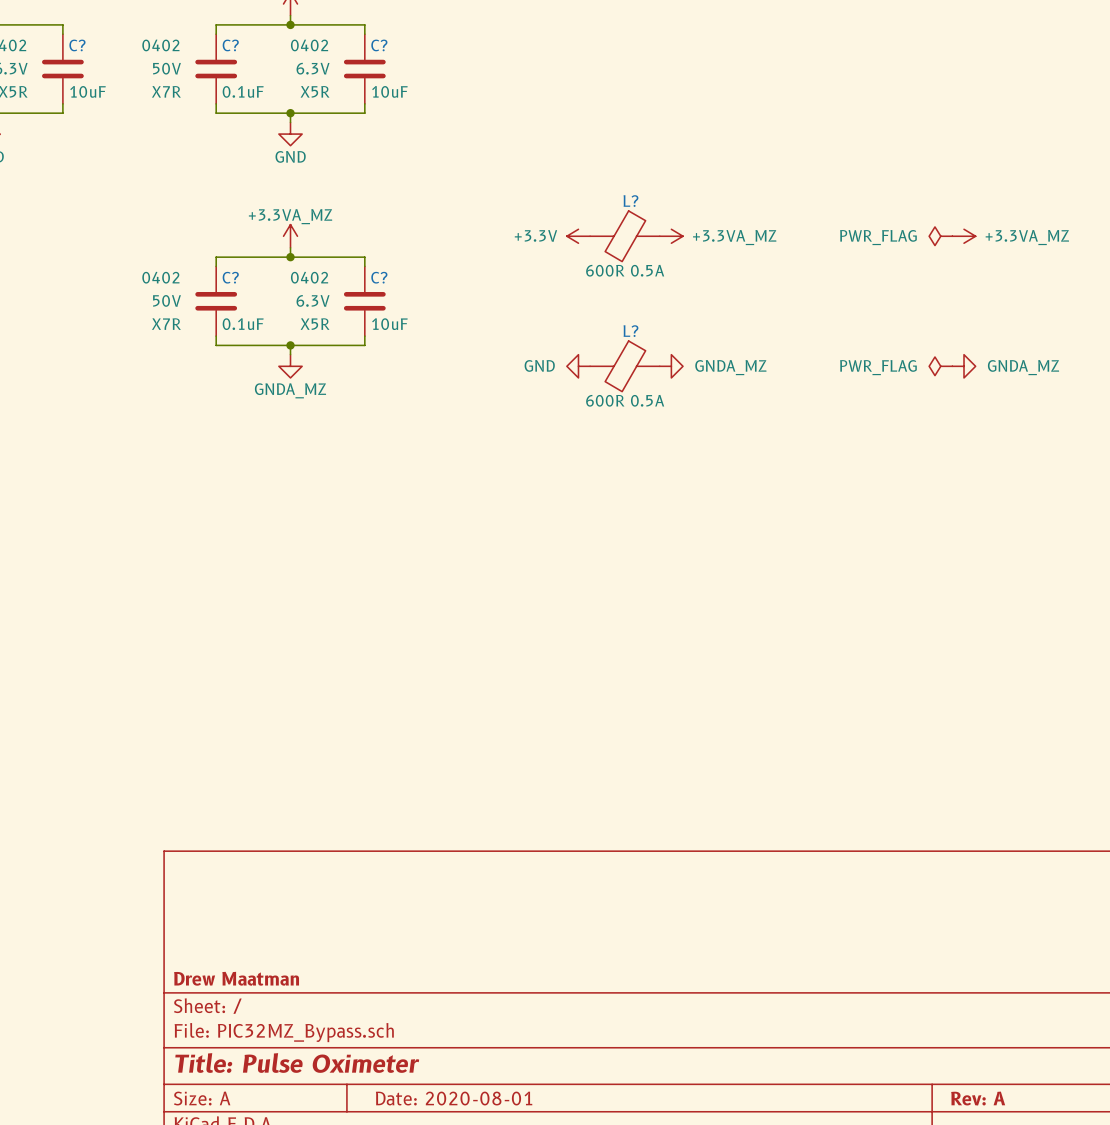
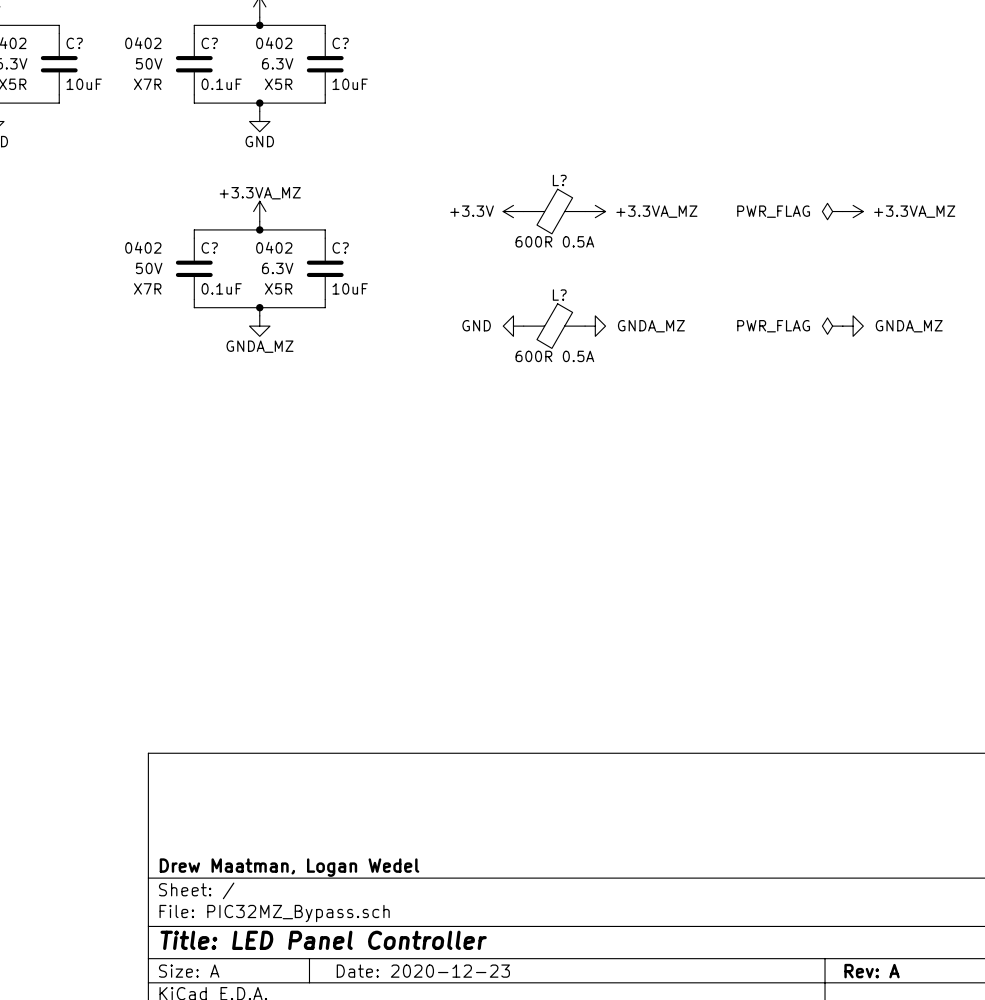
title block: Drew Maatman (236, 978) -> Drew Maatman, Logan Wedel (289, 867)
title block: Title: Pulse Oximeter (297, 1063) -> Title: LED Panel Controller (323, 940)
title block: Date: 2020-08-01 (454, 1098) -> Date: 2020-12-23 (423, 971)

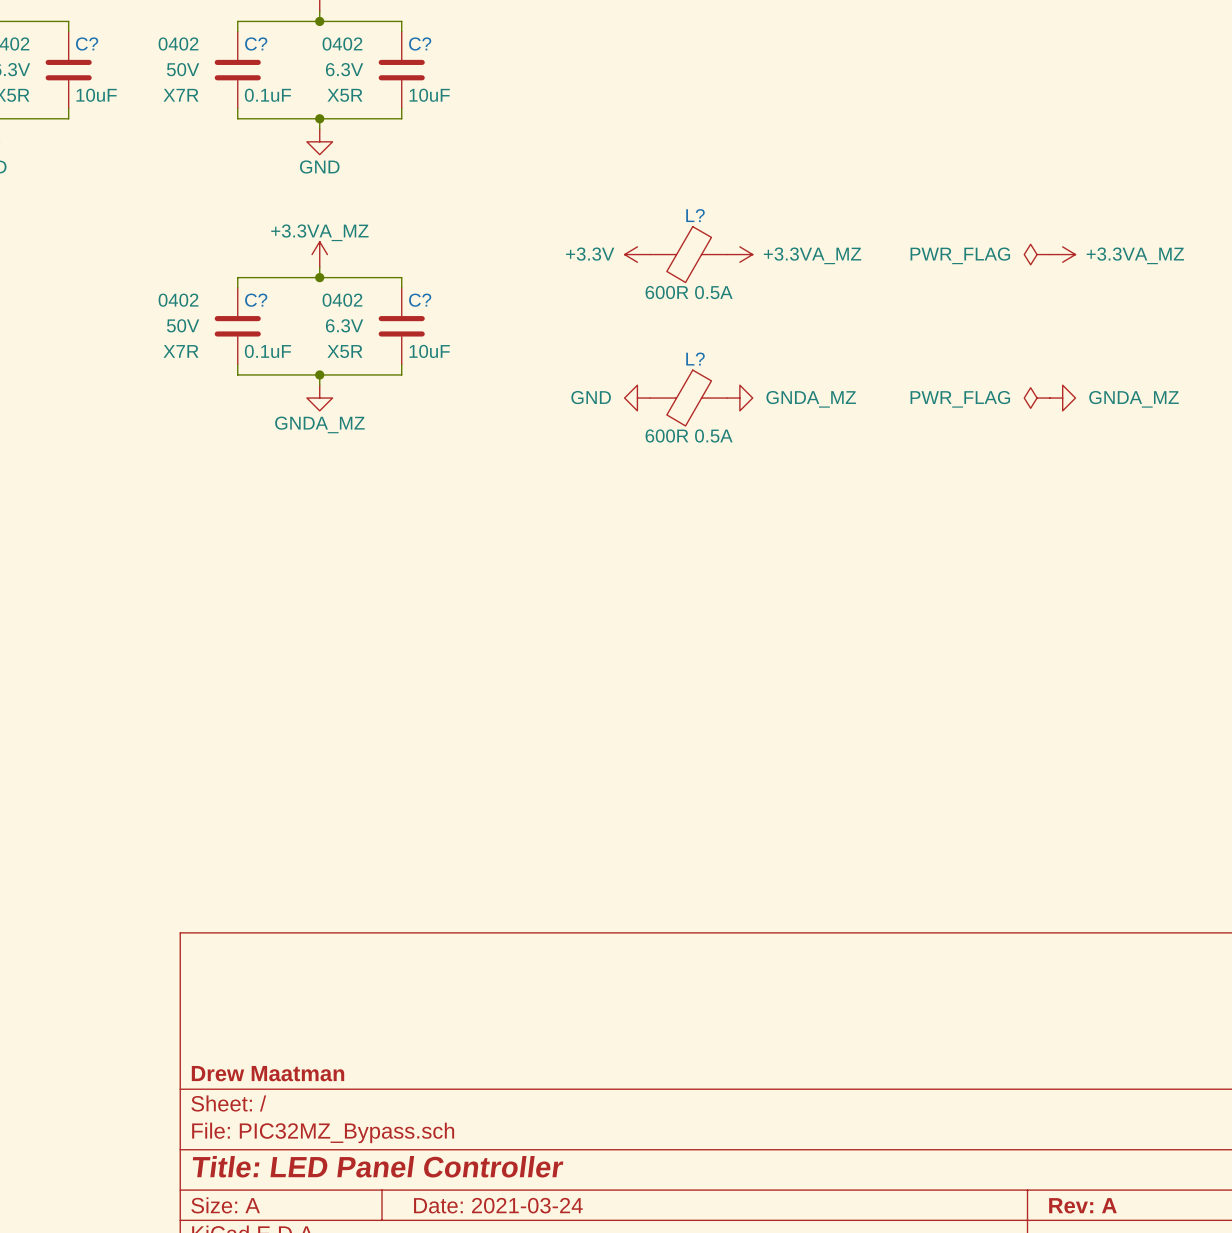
title block: Drew Maatman, Logan Wedel (289, 867) -> Drew Maatman (268, 1073)
title block: Date: 2020-12-23 (423, 971) -> Date: 2021-03-24 (498, 1205)

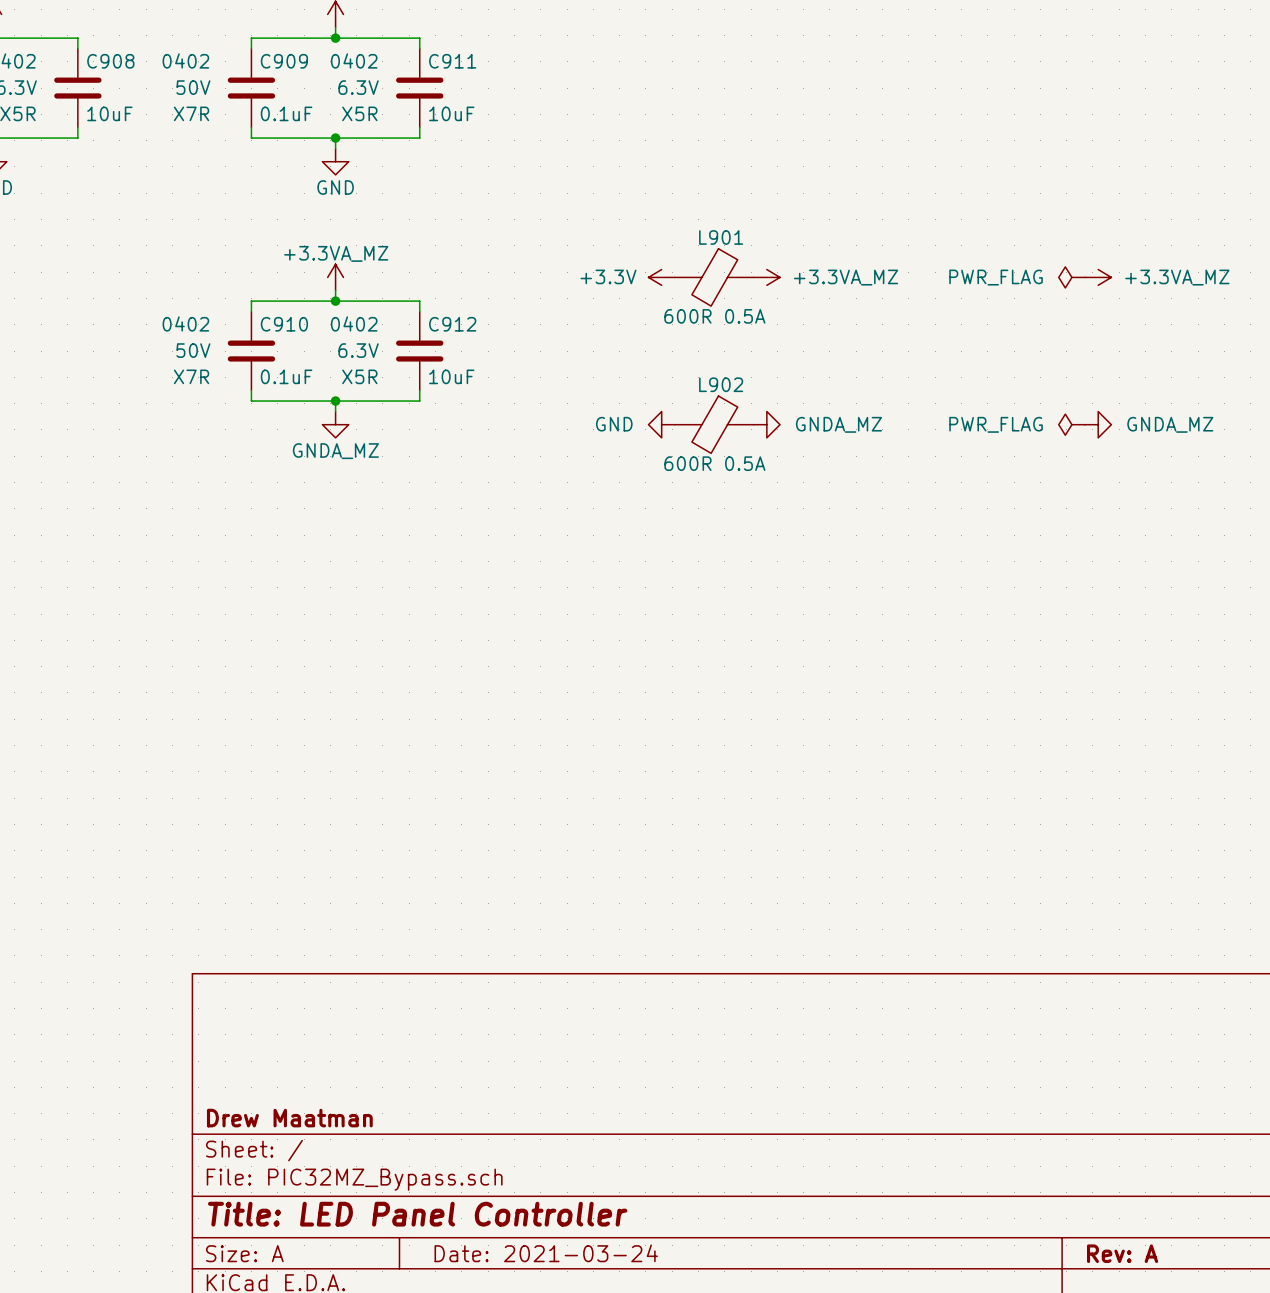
C? name: C? (87, 44) -> C908 (110, 61)
C? name: C? (256, 44) -> C909 (284, 61)
C? name: C? (420, 44) -> C911 (452, 61)
L? name: L? (695, 215) -> L901 (721, 237)
C? name: C? (256, 300) -> C910 (284, 324)
C? name: C? (420, 300) -> C912 (452, 324)
L? name: L? (695, 359) -> L902 (721, 384)

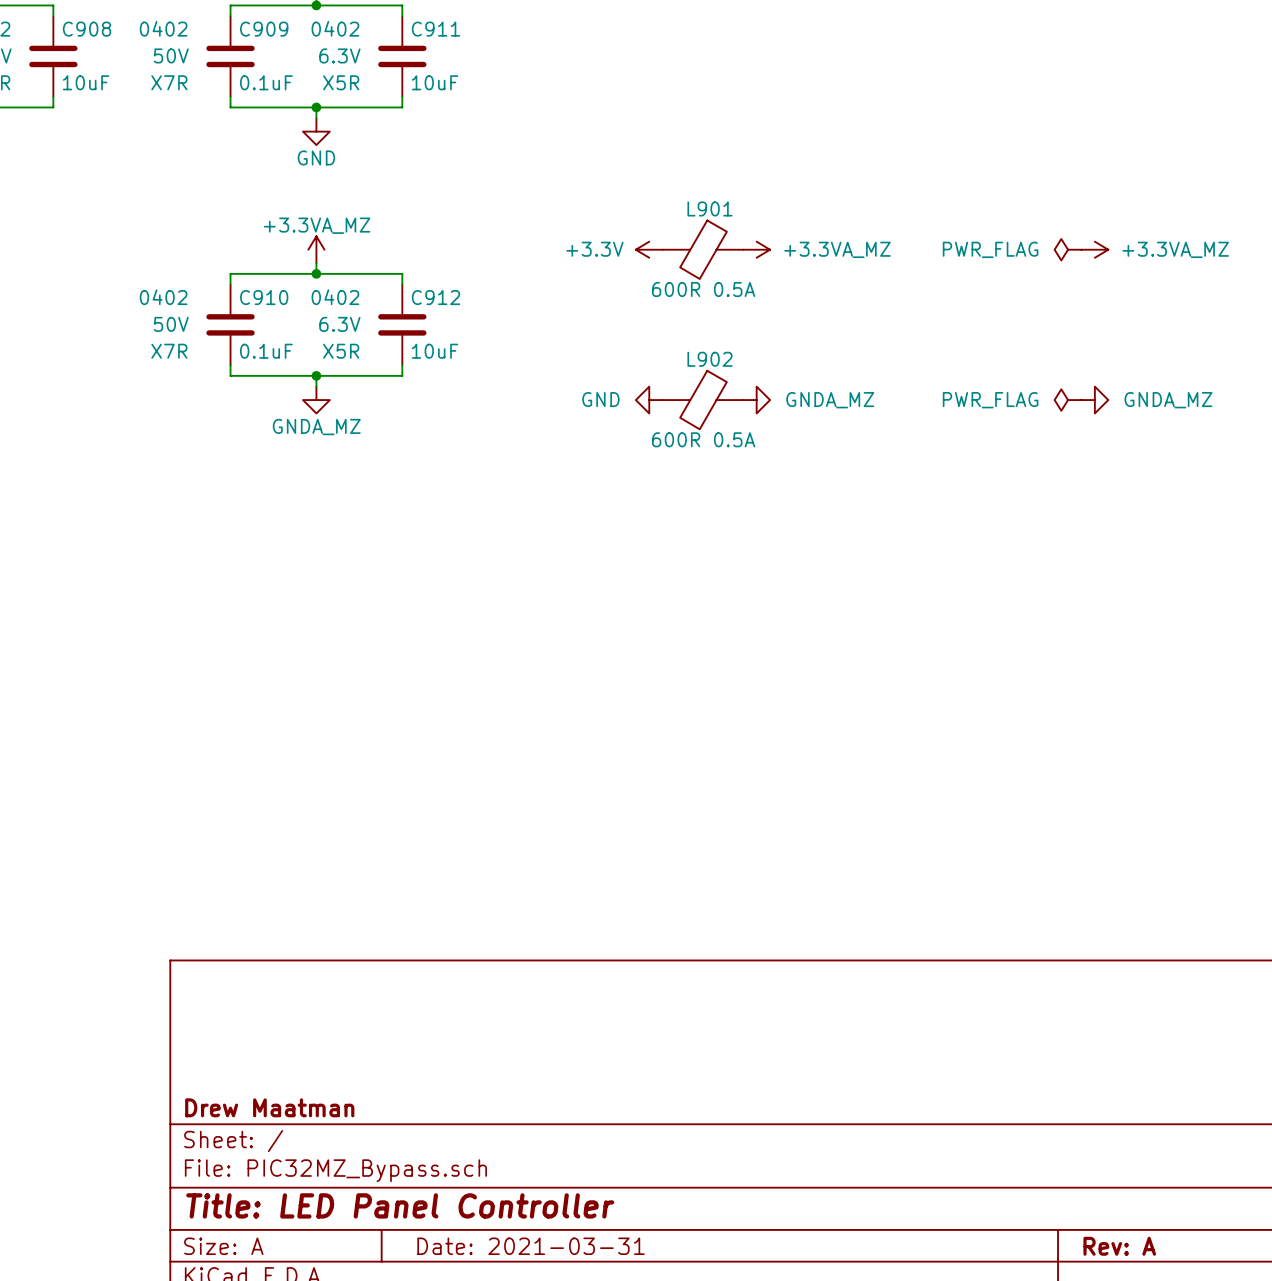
title block: Date: 2021-03-24 (546, 1253) -> Date: 2021-03-31 (531, 1246)

